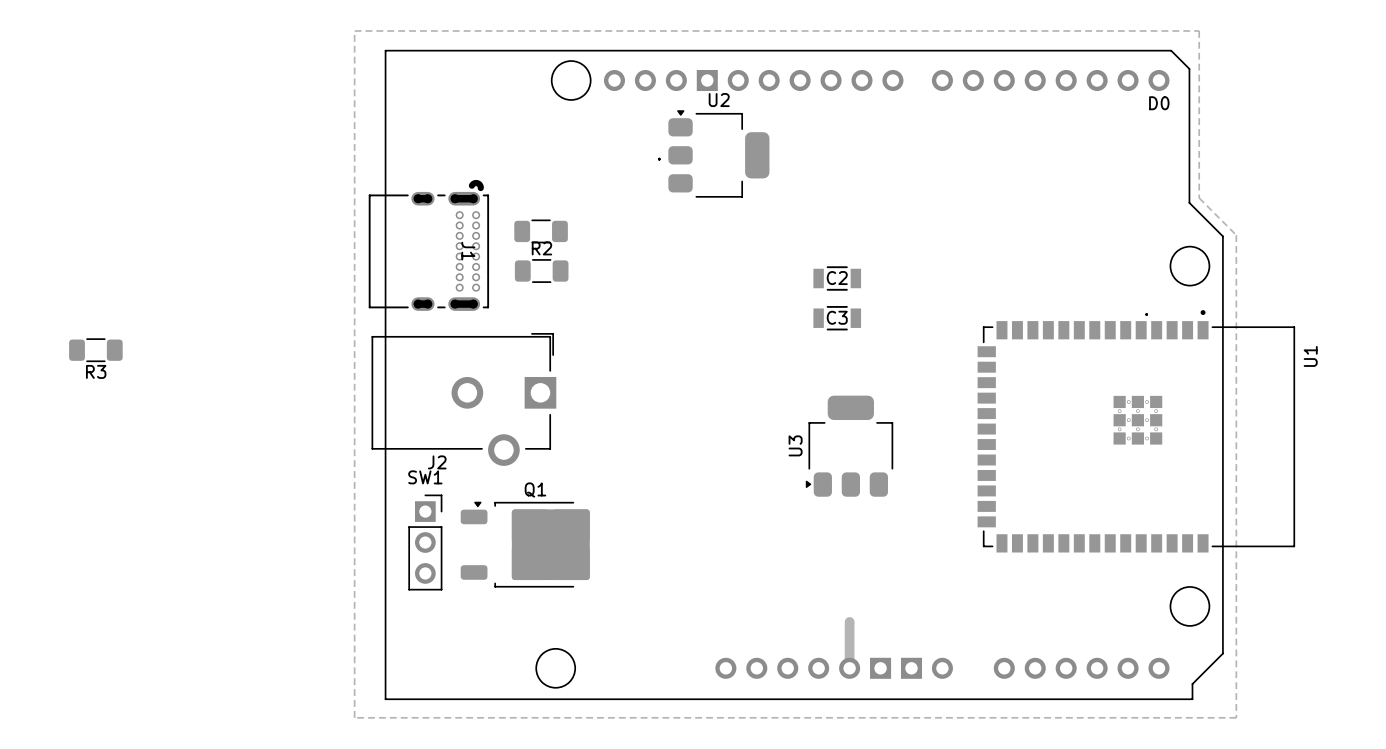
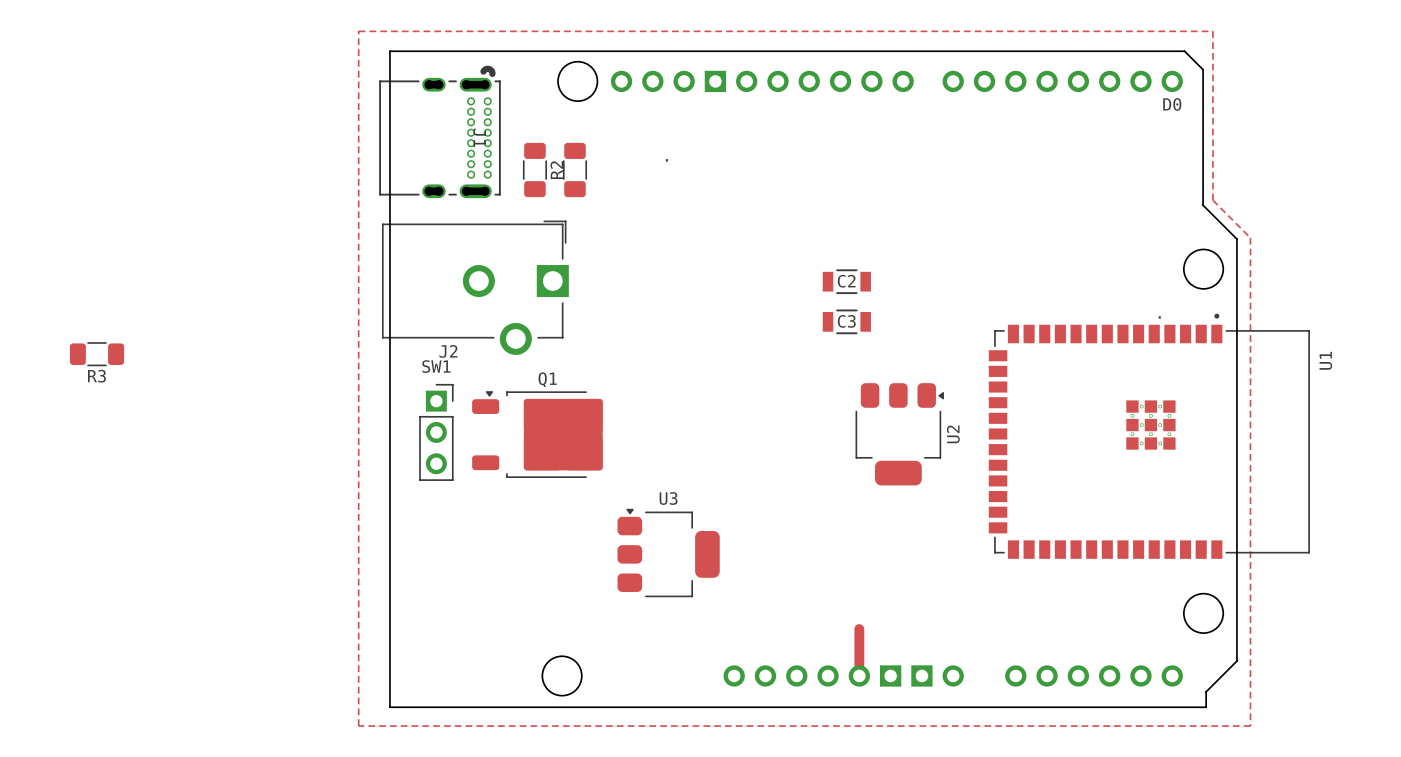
U2 rotation: 0° (718, 153) -> 90° clockwise (899, 434)
U2 position: (718, 153) -> (899, 434)
part rotation: 0° (541, 231) -> 90° clockwise (574, 170)
part position: (541, 231) -> (574, 170)
J1 position: (428, 245) -> (439, 131)
R2 rotation: 0° (541, 271) -> 90° clockwise (534, 170)
R2 position: (541, 271) -> (534, 170)
J2 position: (463, 399) -> (475, 287)
U3 rotation: 0° (849, 446) -> 90° clockwise (668, 552)
U3 position: (849, 446) -> (668, 552)
SW1 position: (425, 542) -> (436, 432)
Q1 position: (525, 544) -> (537, 434)

